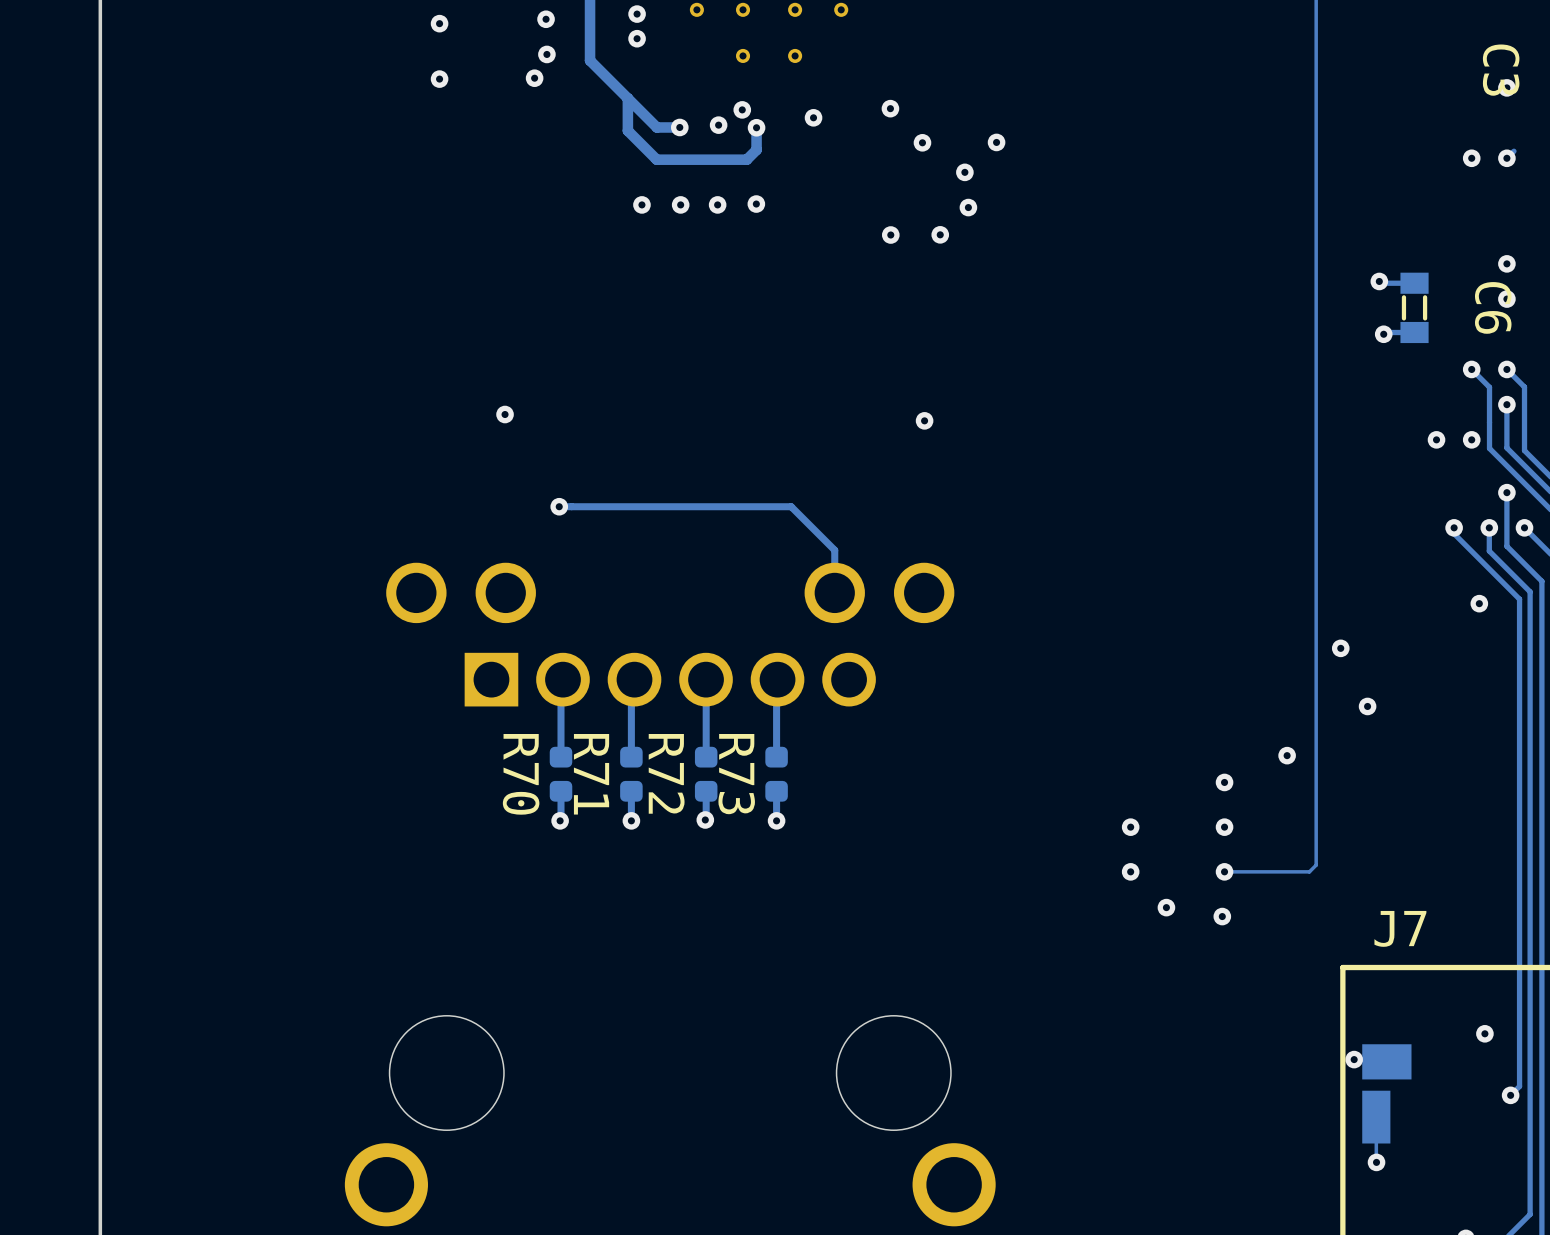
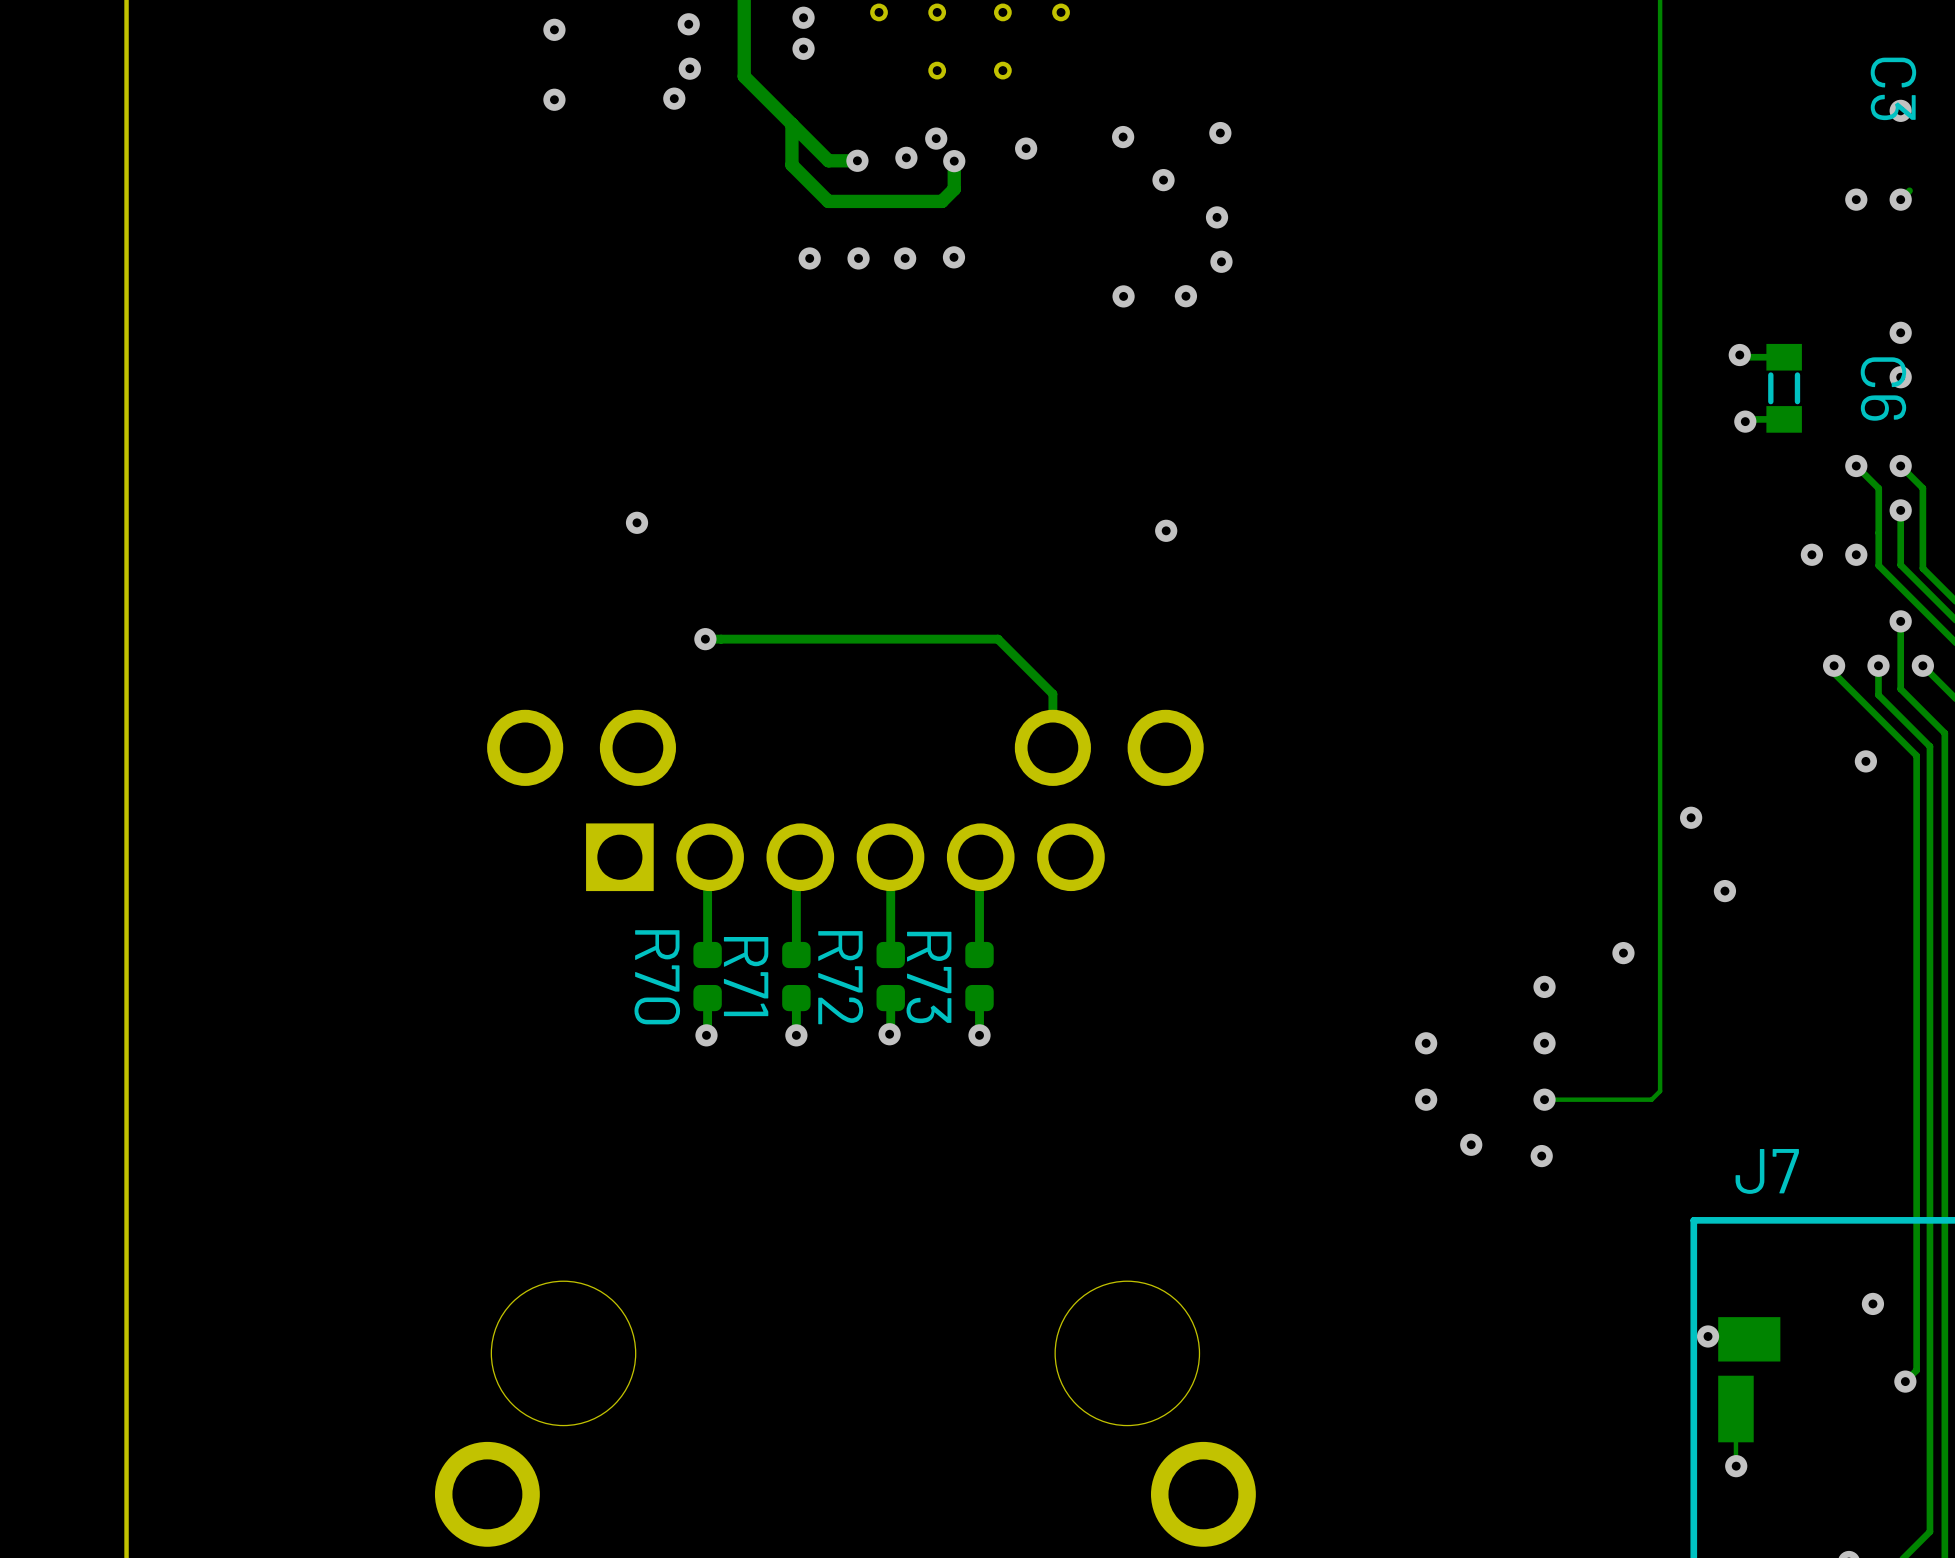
via position: (996, 142) -> (1220, 133)

